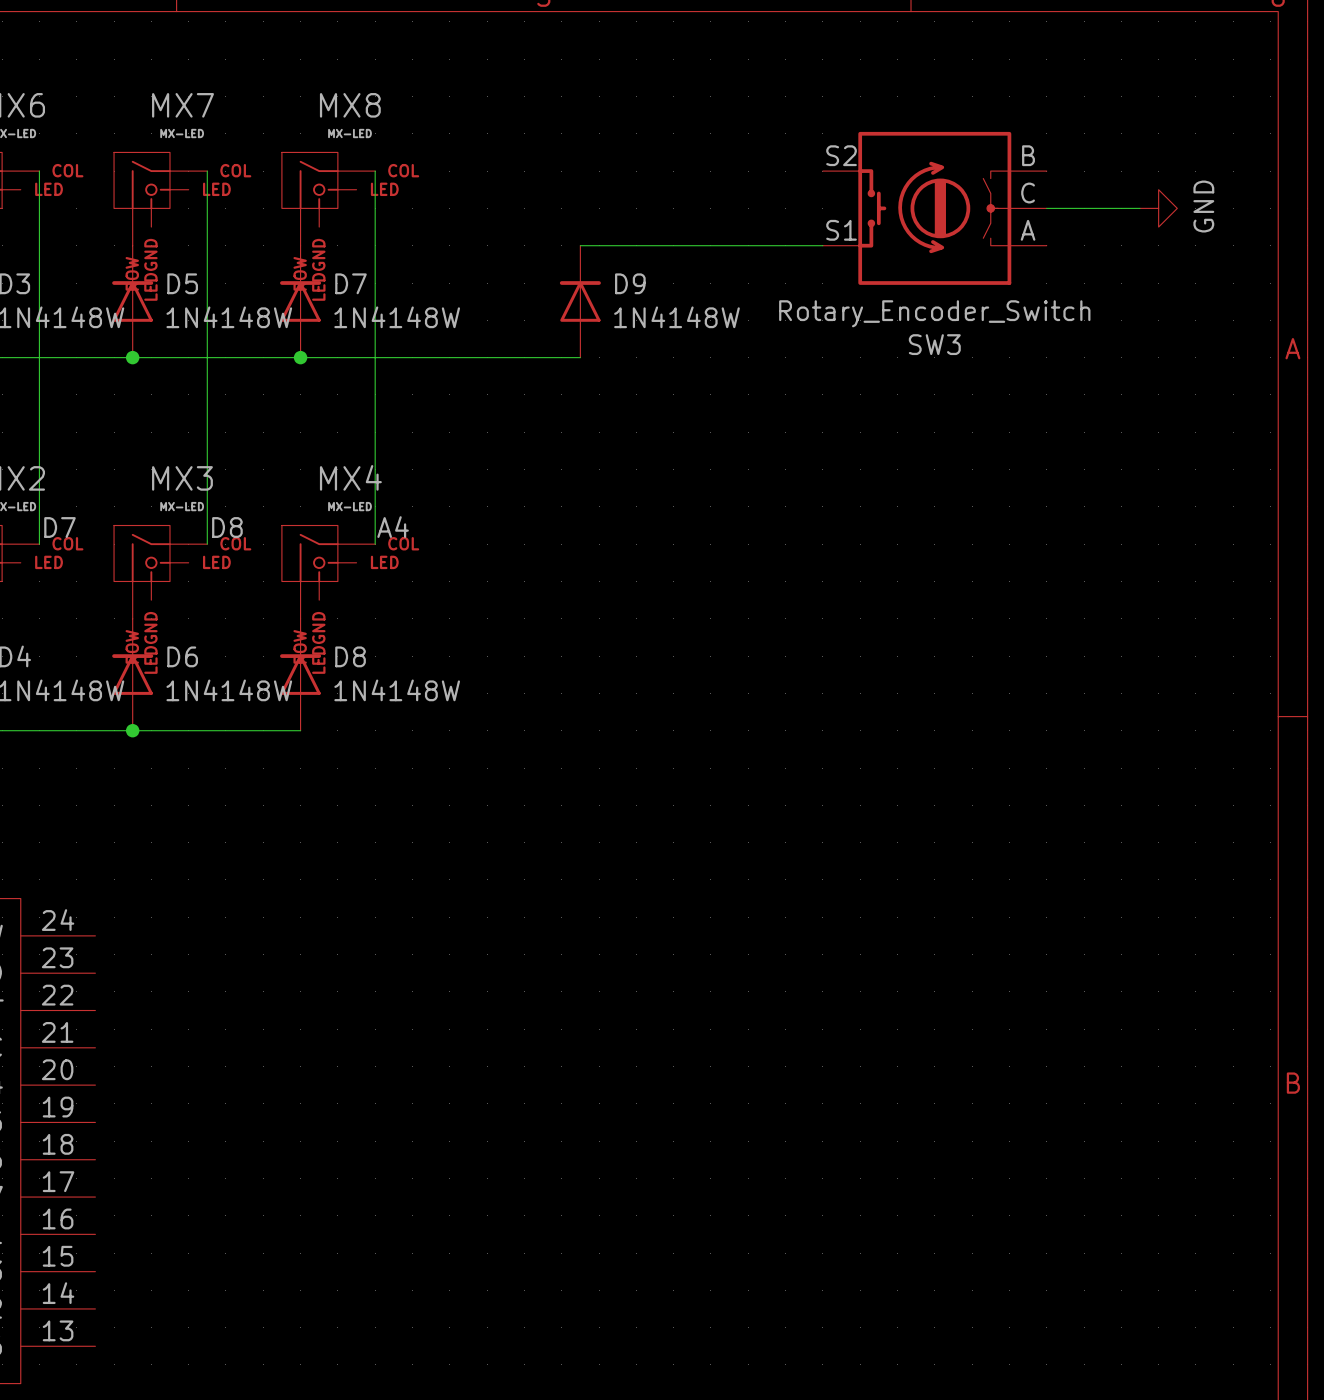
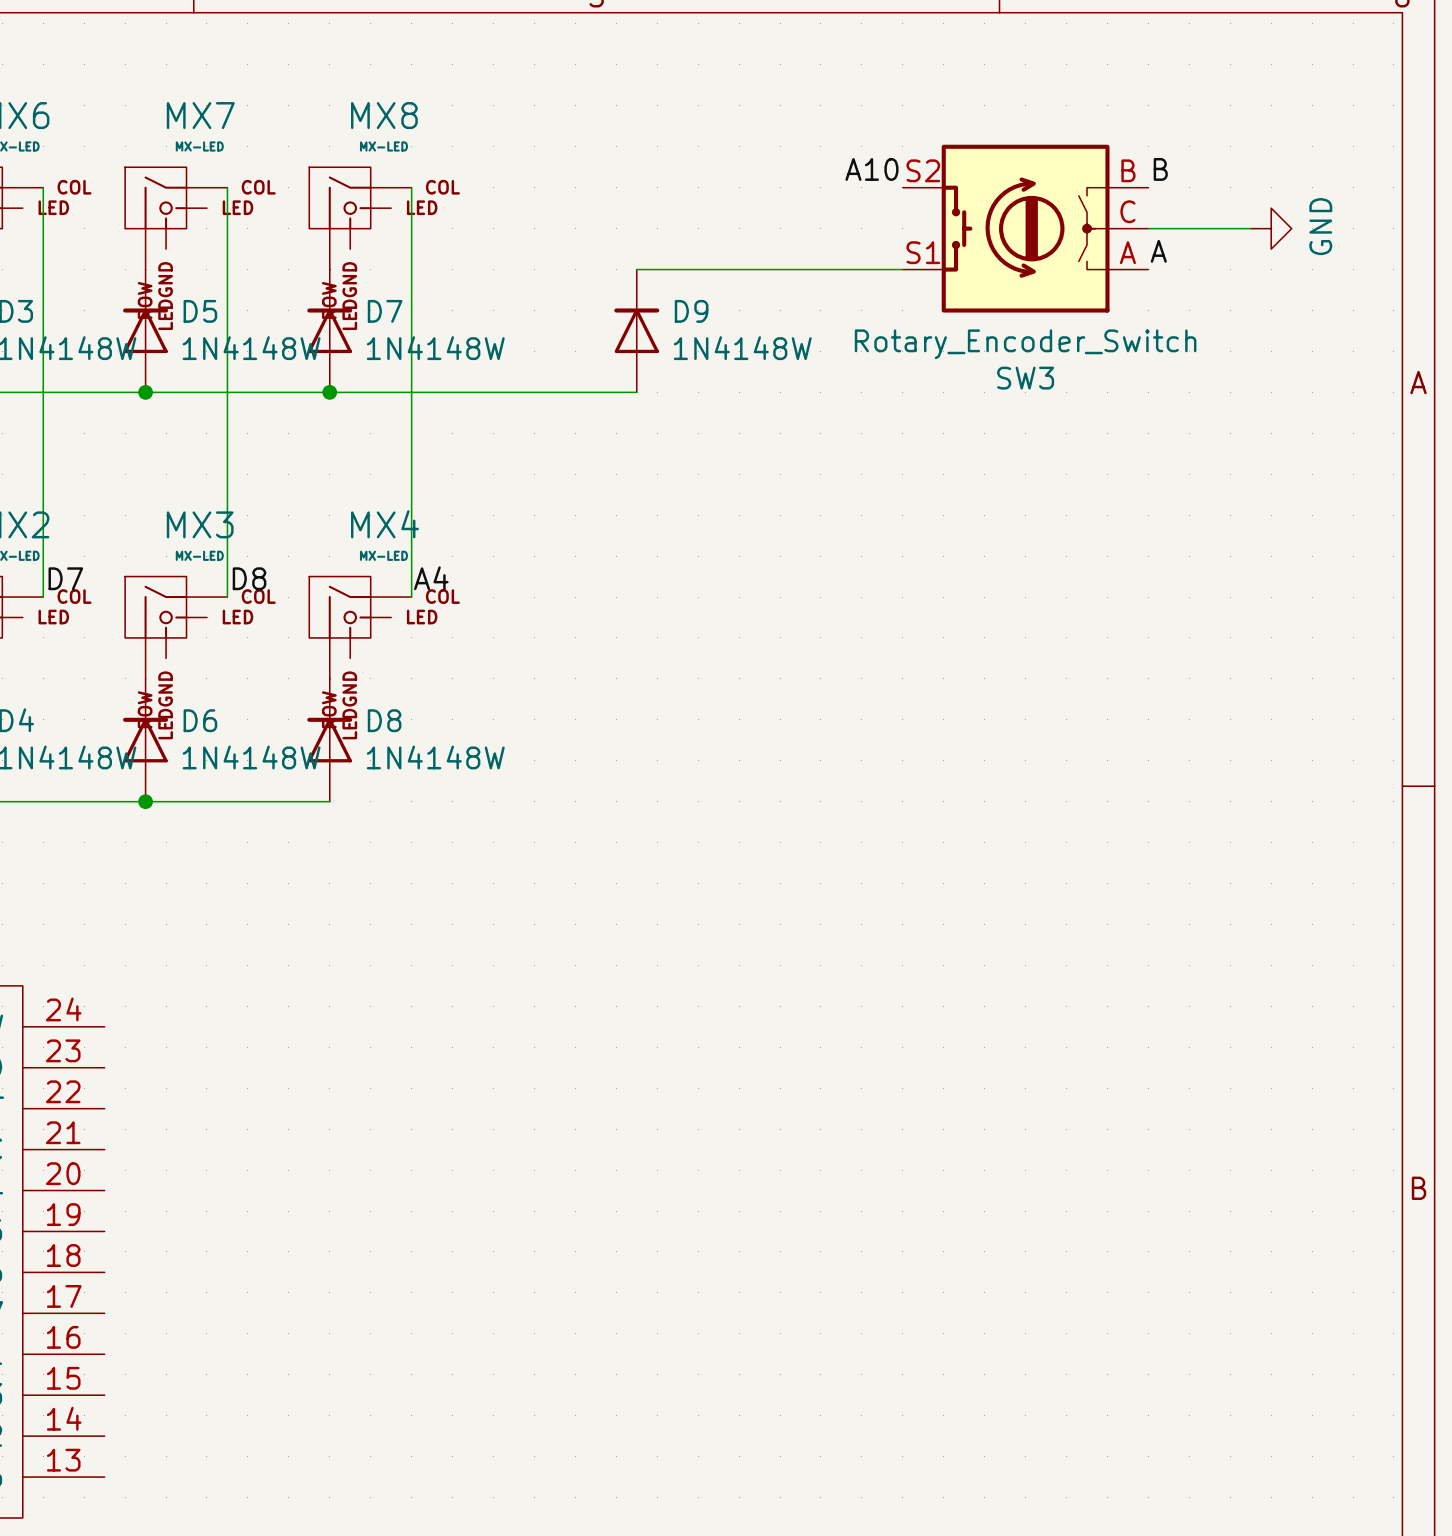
label: none -> A10 (871, 169)
label: none -> B (1160, 169)
label: none -> A (1158, 251)

